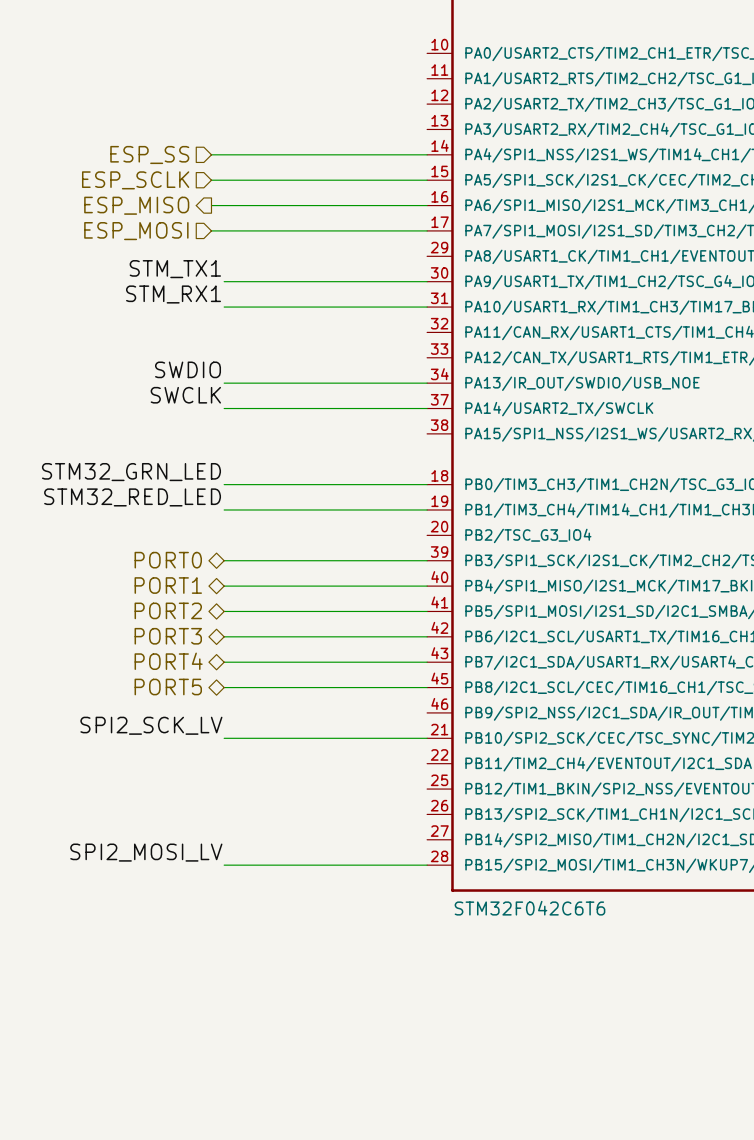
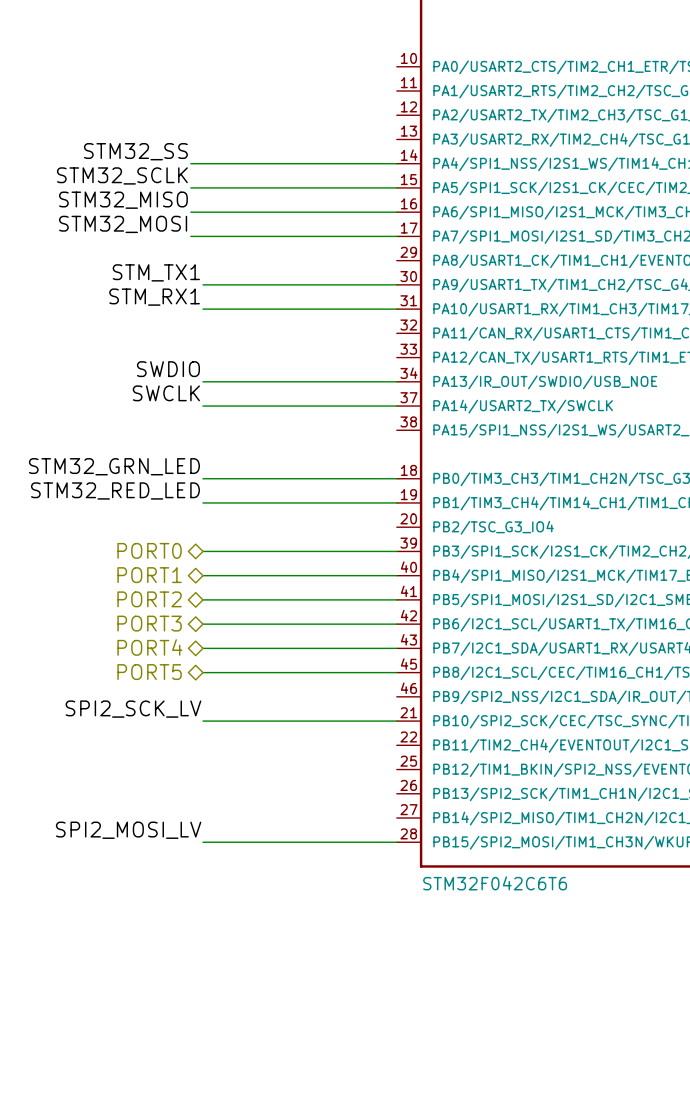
label: none -> STM32_SS (135, 151)
hierarchical label: ESP_SS (149, 154) -> none
label: none -> STM32_SCLK (122, 175)
hierarchical label: ESP_SCLK (135, 180) -> none
label: none -> STM32_MISO (123, 200)
hierarchical label: ESP_MISO (136, 205) -> none
label: none -> STM32_MOSI (123, 224)
hierarchical label: ESP_MOSI (136, 231) -> none

